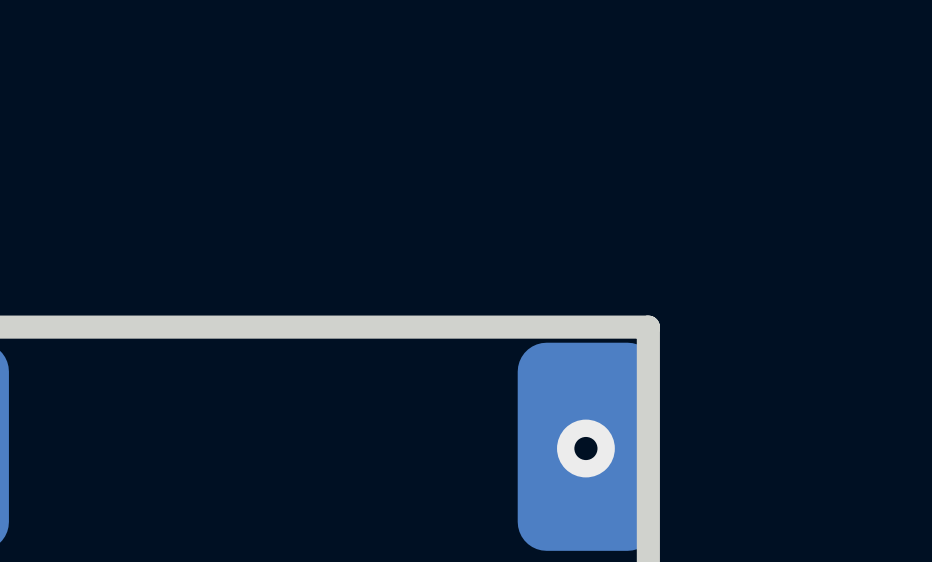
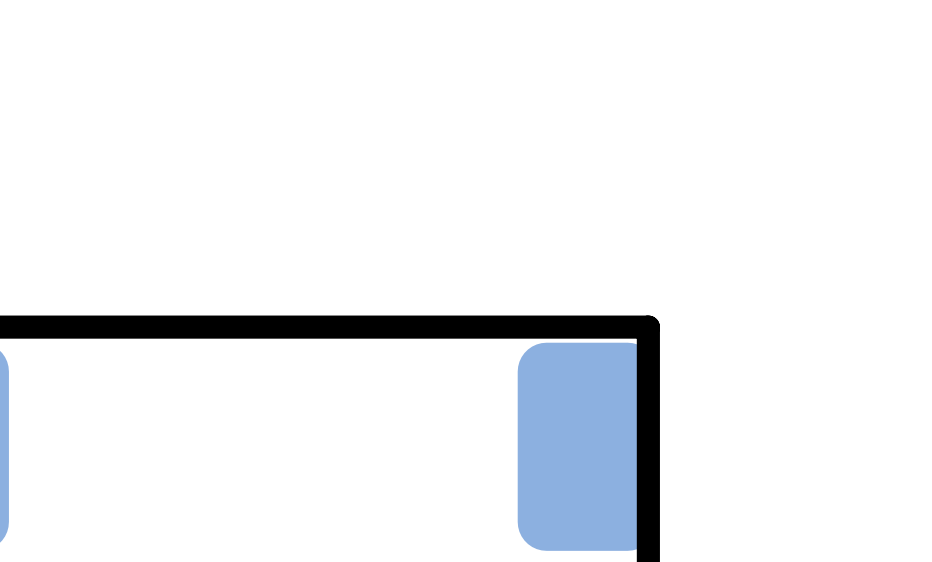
via: (585, 448) -> none

